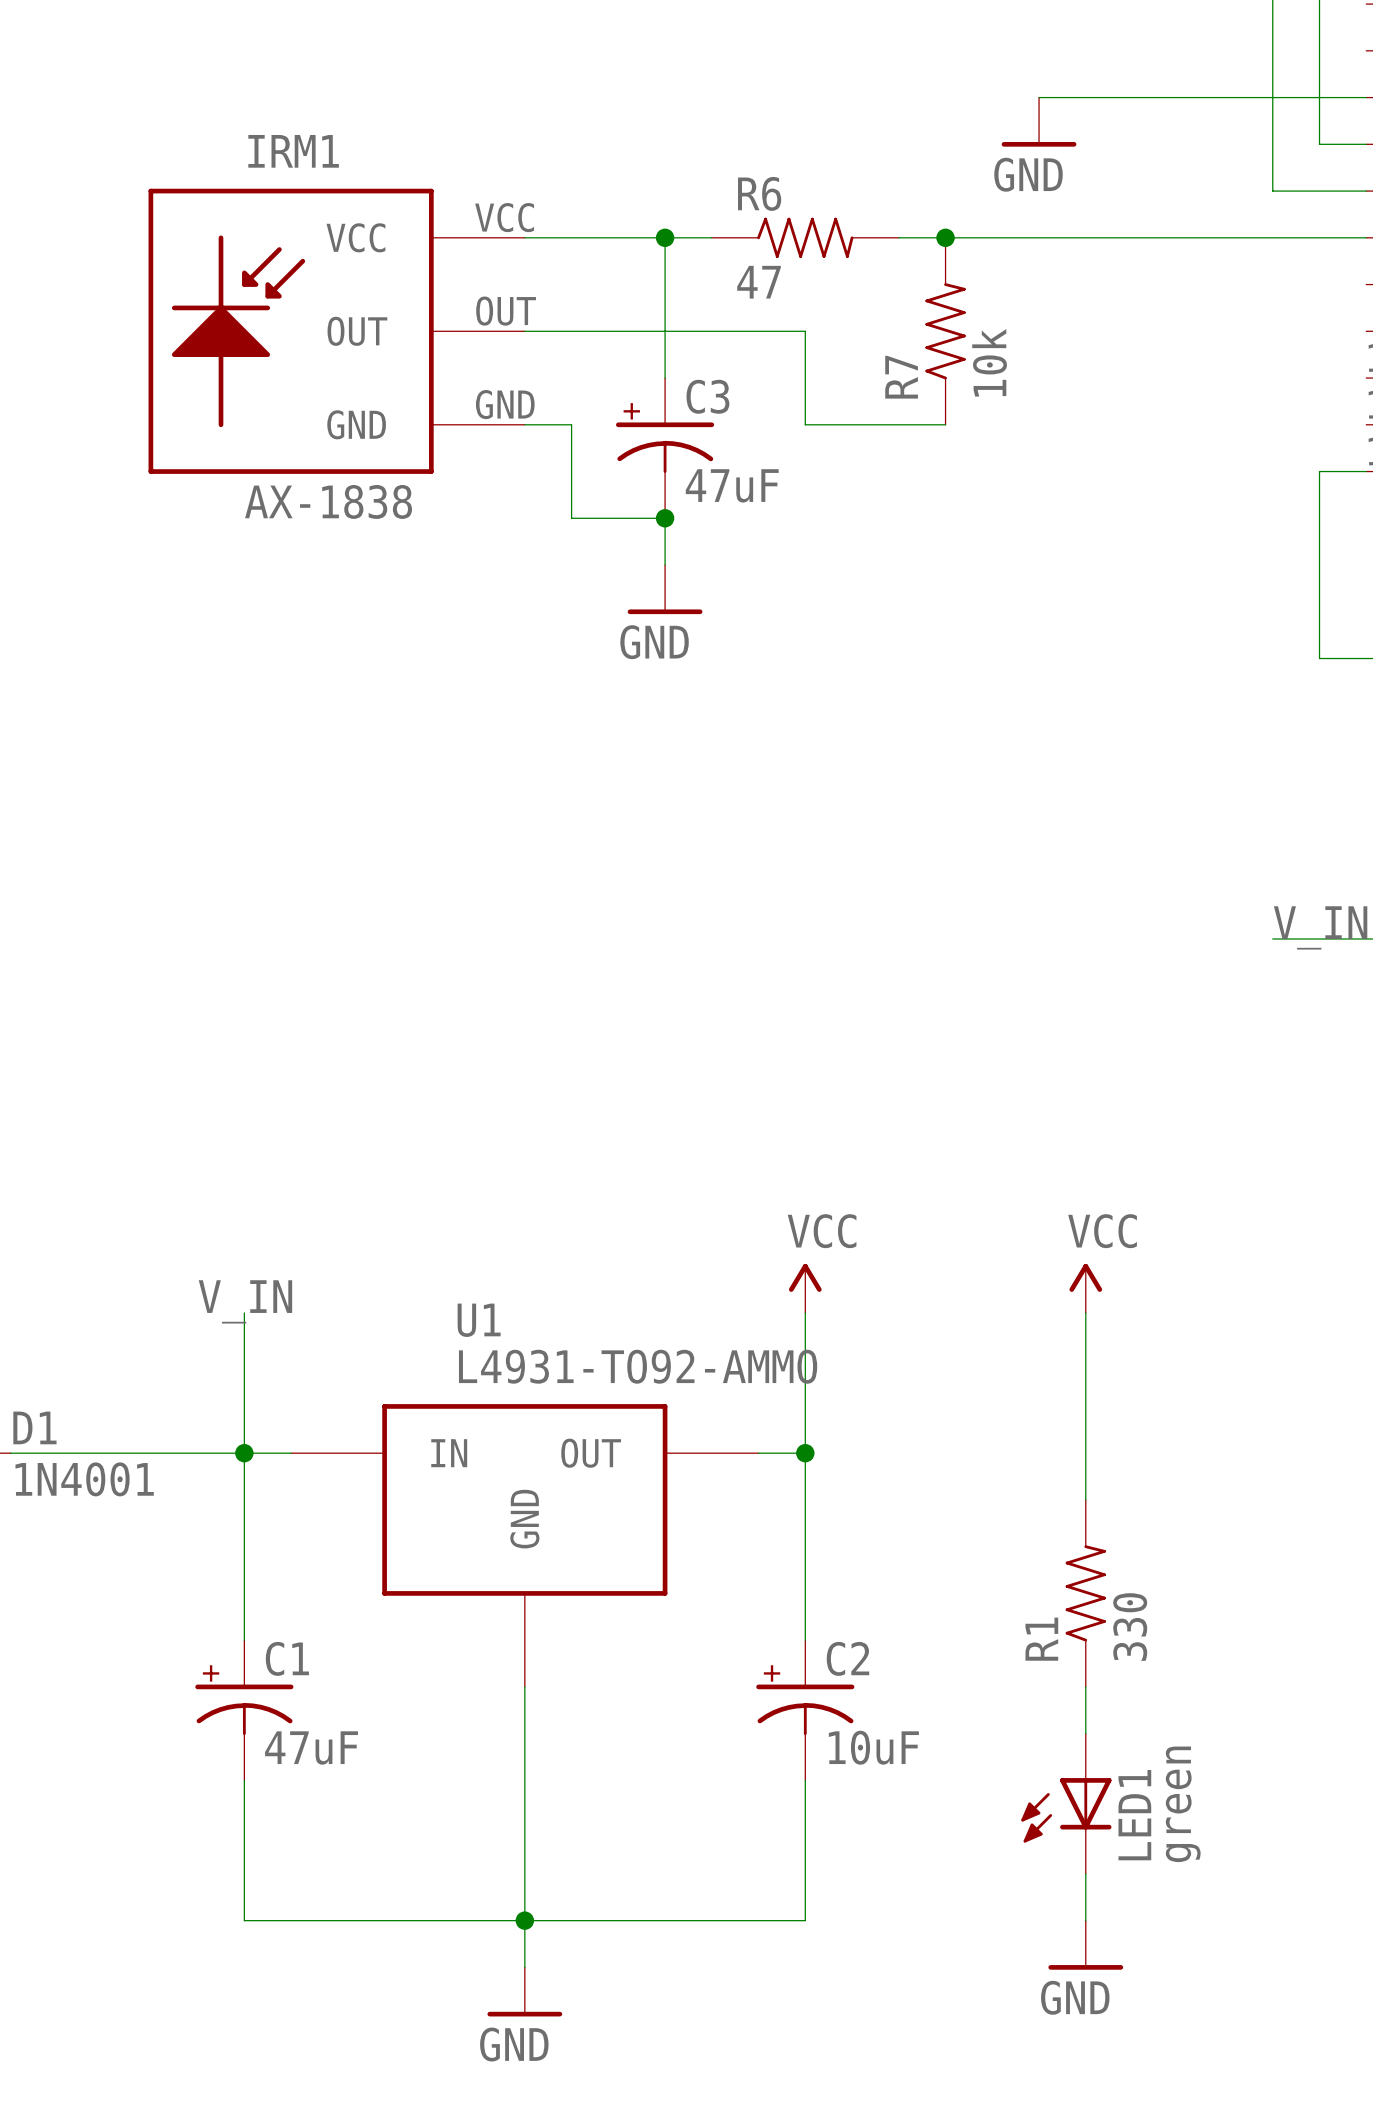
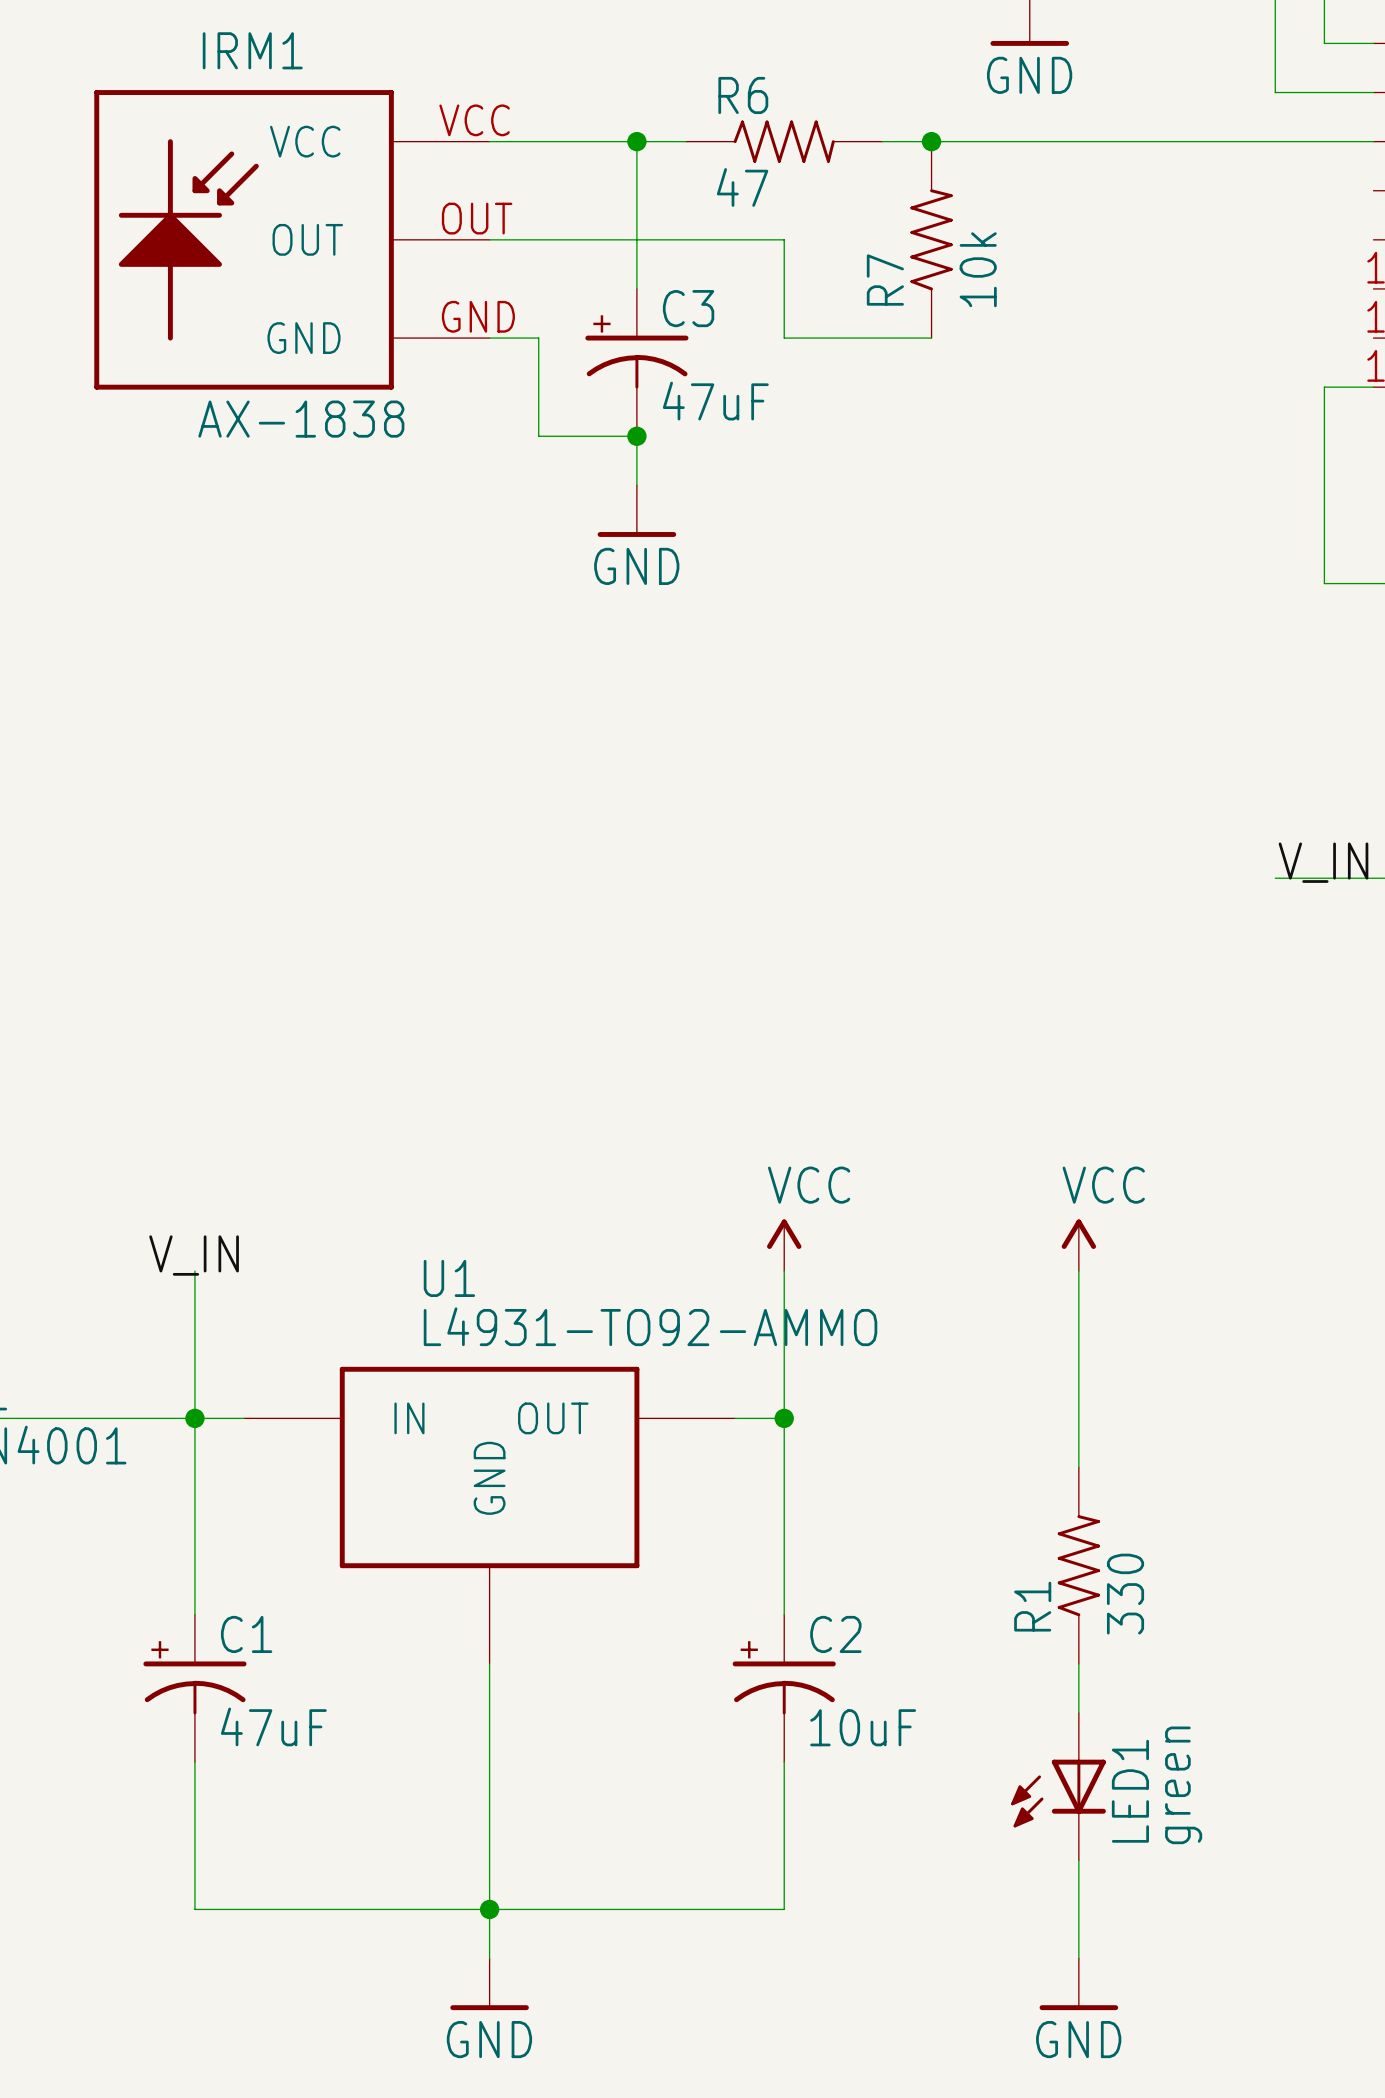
power symbol position: GND (1085, 1945) -> GND (1078, 1984)

